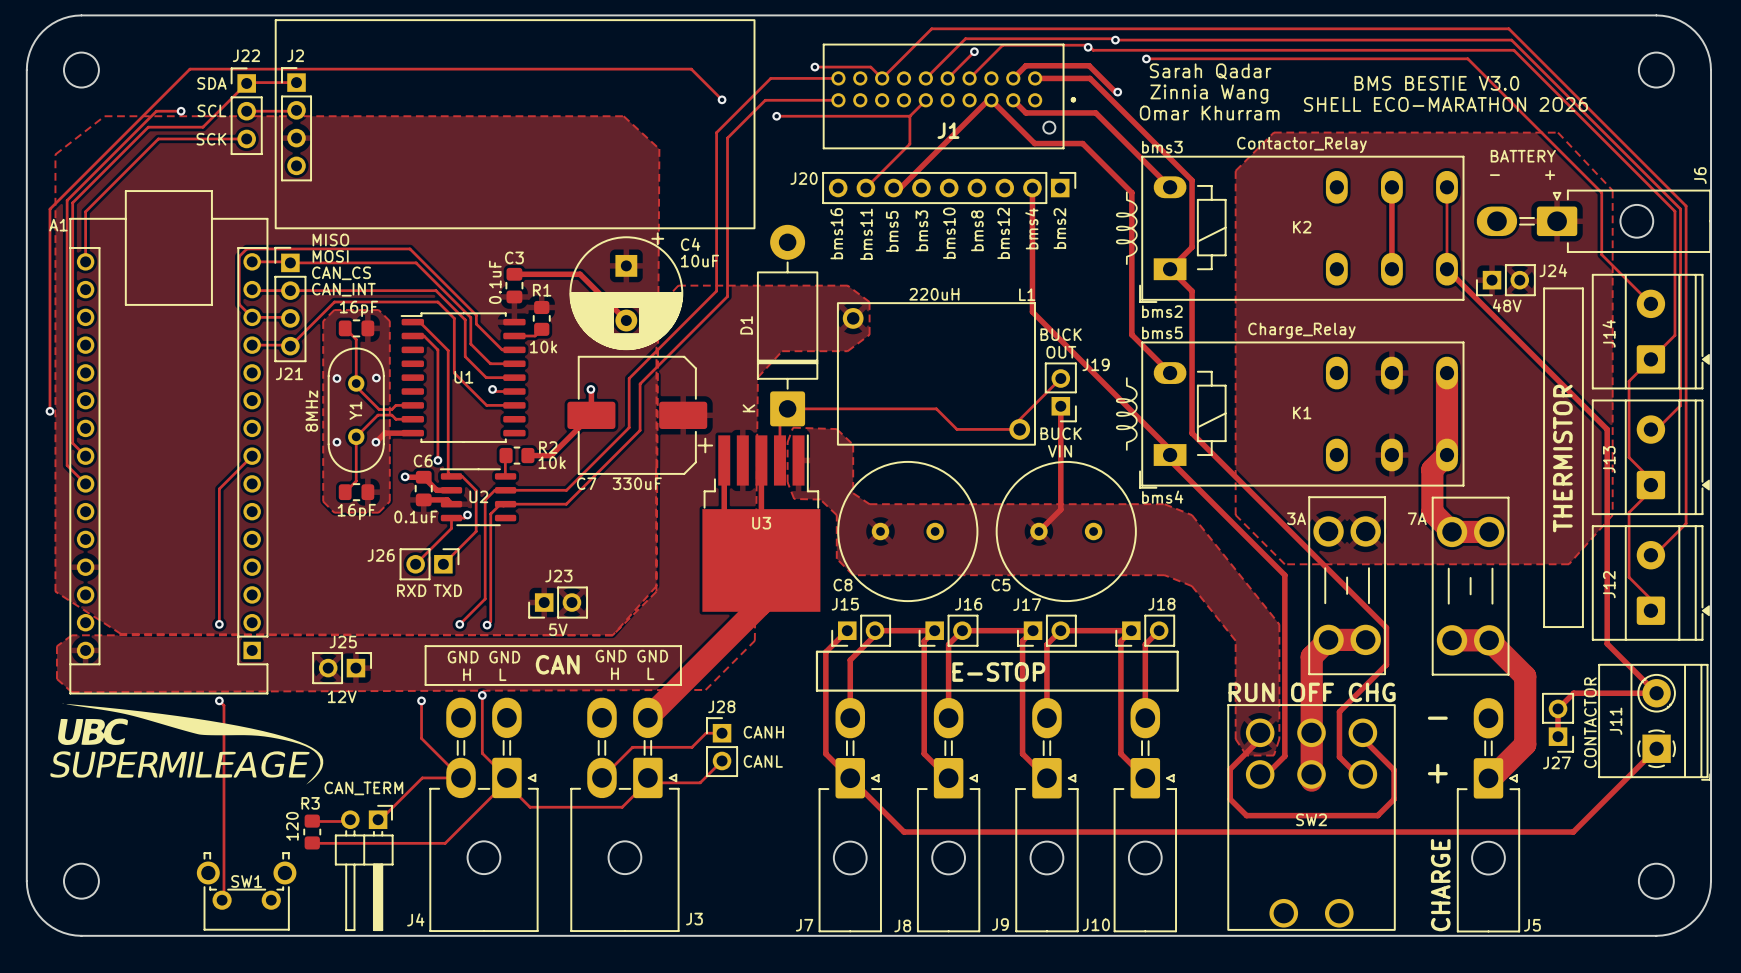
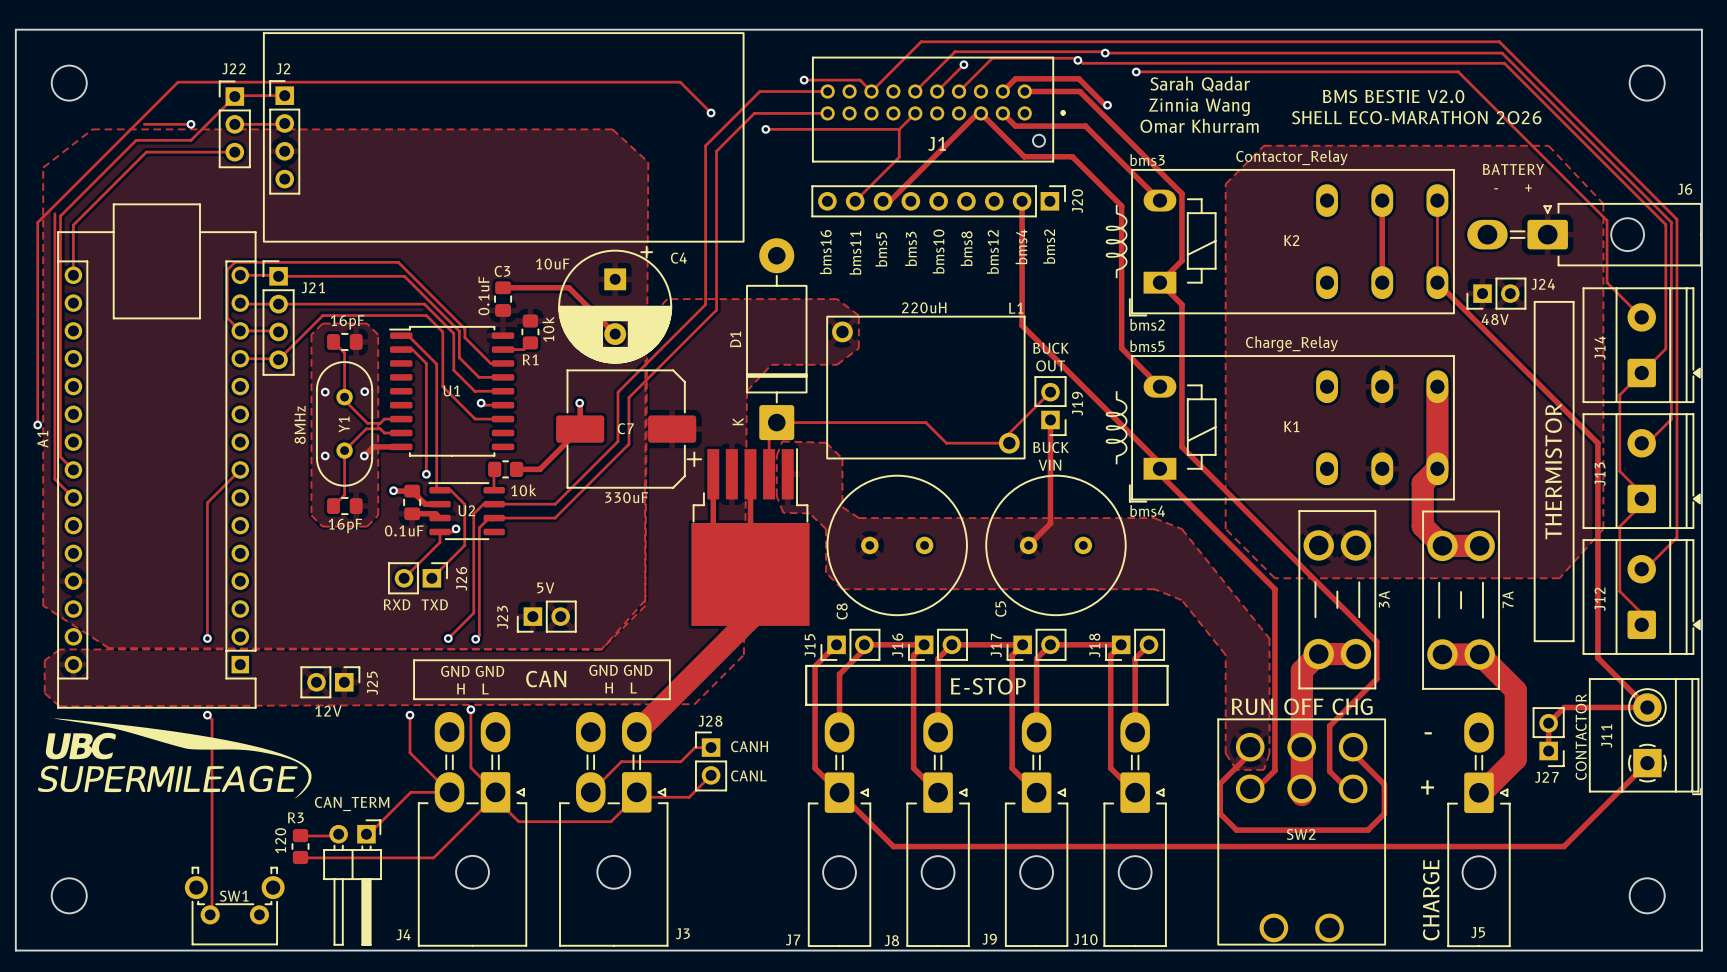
board edge: (1711, 70) (1705, 46) (1695, 31) (1680, 20) (1656, 15) (81, 15) (57, 20) (47, 27) (35, 40) (29, 52) (26, 70) (26, 881) (32, 904) (42, 919) (57, 930) (81, 935) -> (1701, 83) (1701, 29) (15, 29) (15, 950) (69, 950)
text: SDA (211, 83) -> none
text: BMS BESTIE V3.0 (1436, 83) -> BMS BESTIE V2.0 (1393, 96)
text: SCL (211, 110) -> none
track: (156, 111) (67, 200) -> none
track: none -> (169, 124) (191, 124)
via position: (181, 111) -> (191, 124)
text: SCK (211, 139) -> none
J6 name rotation: 0° (1700, 175) -> 90° clockwise (1684, 189)
J20 name rotation: 0° (804, 178) -> 90° counterclockwise (1077, 201)
J20 name position: J20 (804, 178) -> J20 (1077, 201)
track: (1601, 192) (1601, 254) (1616, 269) -> (1592, 206) (1607, 220) (1607, 282)
A1 name rotation: 0° (58, 225) -> 90° counterclockwise (42, 439)
A1 name position: A1 (58, 225) -> A1 (42, 439)
text: MISO (330, 240) -> none
text: MOSI (330, 256) -> none
C4 value position: 10uF (699, 261) -> 10uF (552, 264)
text: CAN_CS (341, 273) -> none
text: CAN_INT (343, 289) -> none
R1 name position: R1 (542, 290) -> R1 (530, 359)
R1 value rotation: 0° (543, 346) -> 90° counterclockwise (548, 329)
J19 name rotation: 0° (1096, 364) -> 90° counterclockwise (1077, 403)
J21 name position: J21 (289, 373) -> J21 (313, 287)
R2 name: R2 (548, 447) -> none
C6 name: C6 (423, 460) -> none
R2 value position: 10k (552, 462) -> 10k (523, 490)
C7 name position: C7 (586, 483) -> C7 (625, 428)
part value rotation: 0° (1296, 518) -> 90° counterclockwise (1384, 599)
part value position: 3A (1296, 518) -> 3A (1384, 599)
part value rotation: 0° (1417, 518) -> 90° counterclockwise (1507, 599)
part value position: 7A (1417, 518) -> 7A (1507, 599)
U3 name: U3 (761, 523) -> none
J26 name rotation: 0° (381, 555) -> 90° counterclockwise (461, 578)
J26 name position: J26 (381, 555) -> J26 (461, 578)
J23 name rotation: 0° (558, 576) -> 90° counterclockwise (502, 617)
J23 name position: J23 (558, 576) -> J23 (502, 617)
C8 name rotation: 0° (842, 585) -> 90° counterclockwise (842, 611)
C5 name rotation: 0° (1001, 585) -> 90° counterclockwise (1000, 608)
J15 name rotation: 0° (845, 604) -> 90° counterclockwise (810, 645)
J16 name rotation: 0° (968, 604) -> 90° counterclockwise (897, 645)
J16 name position: J16 (968, 604) -> J16 (897, 645)
J17 name rotation: 0° (1027, 604) -> 90° counterclockwise (996, 645)
J18 name rotation: 0° (1161, 604) -> 90° counterclockwise (1094, 645)
J18 name position: J18 (1161, 604) -> J18 (1094, 645)
text position: 5V (558, 629) -> 5V (545, 587)
J25 name rotation: 0° (343, 642) -> 90° counterclockwise (372, 683)
J25 name position: J25 (343, 642) -> J25 (372, 683)
board edge: (1711, 881) (1707, 899) (1695, 919) (1674, 932) (1656, 935) -> (1701, 895) (1701, 950) (1647, 950)
J5 name position: J5 (1532, 925) -> J5 (1478, 932)

